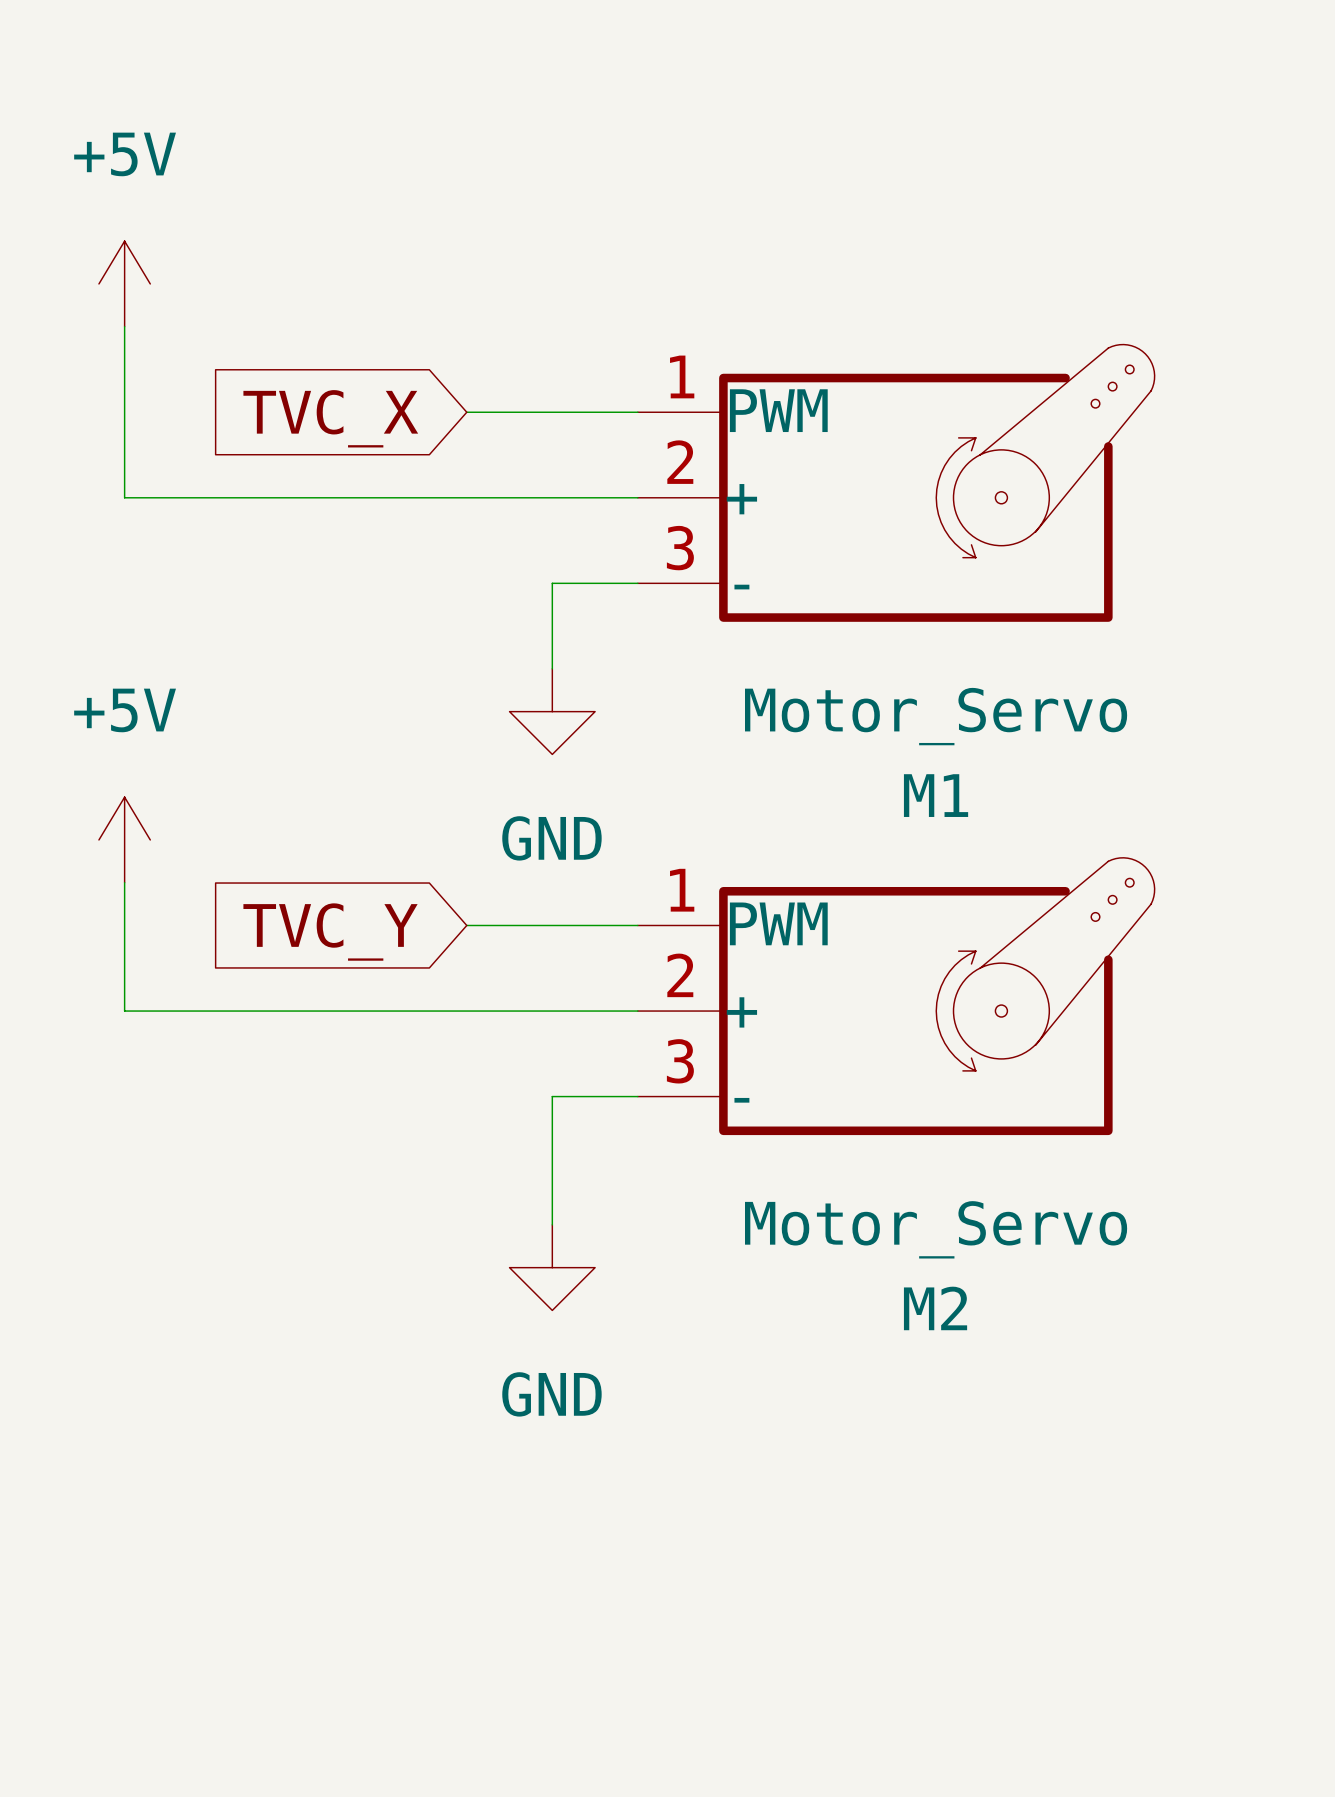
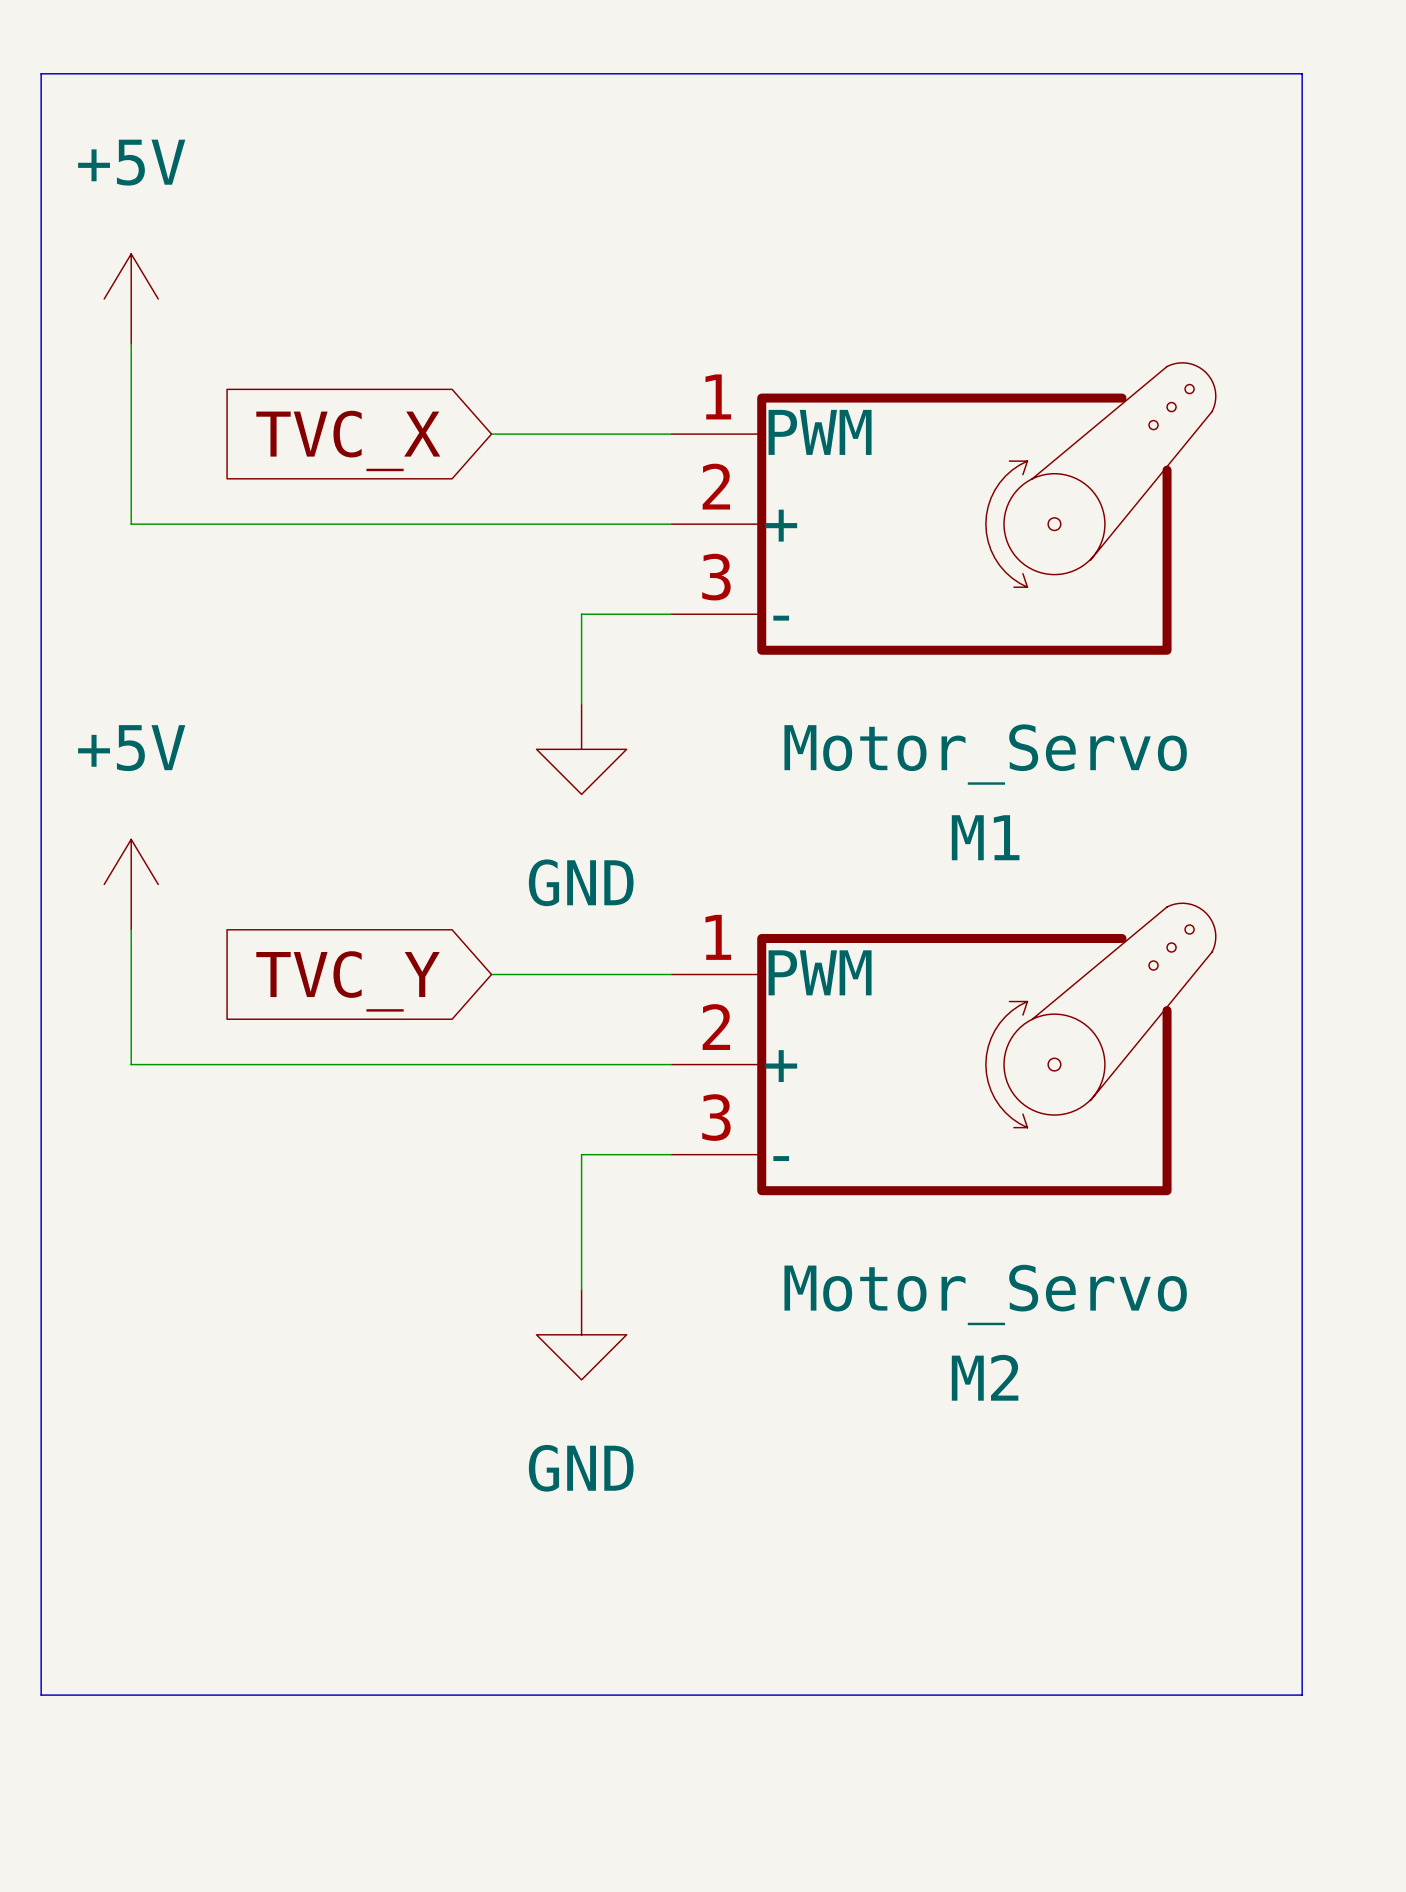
line: none -> (41, 73) (1302, 73) (1302, 1695) (41, 1695) (41, 73)

